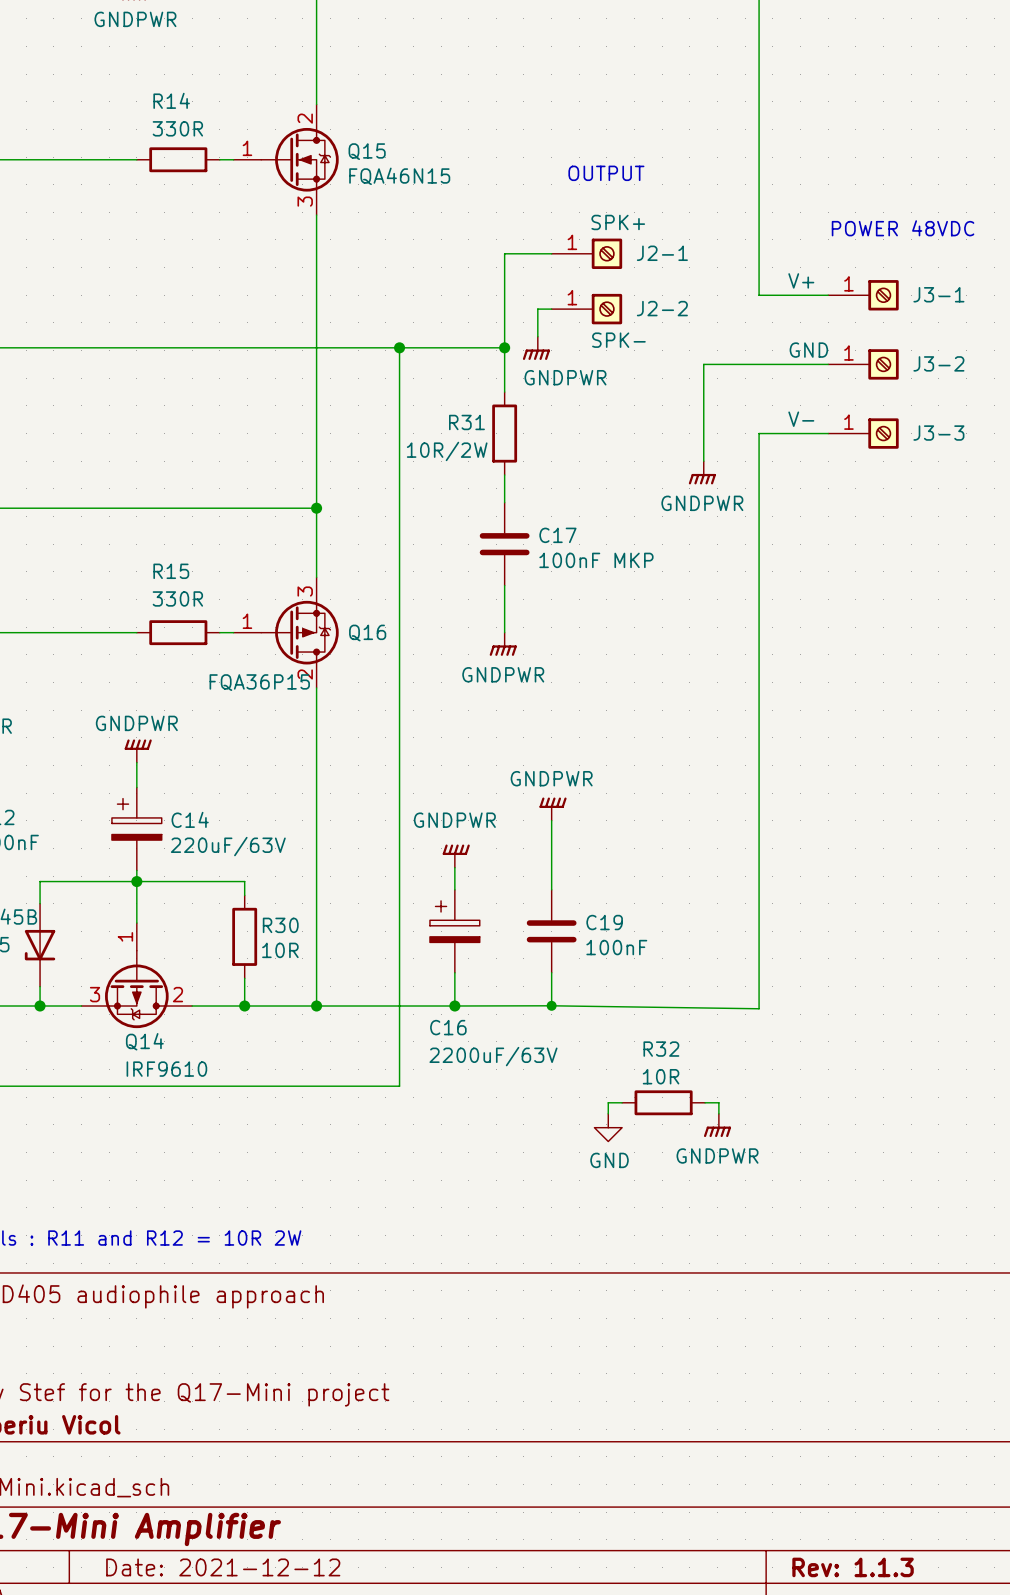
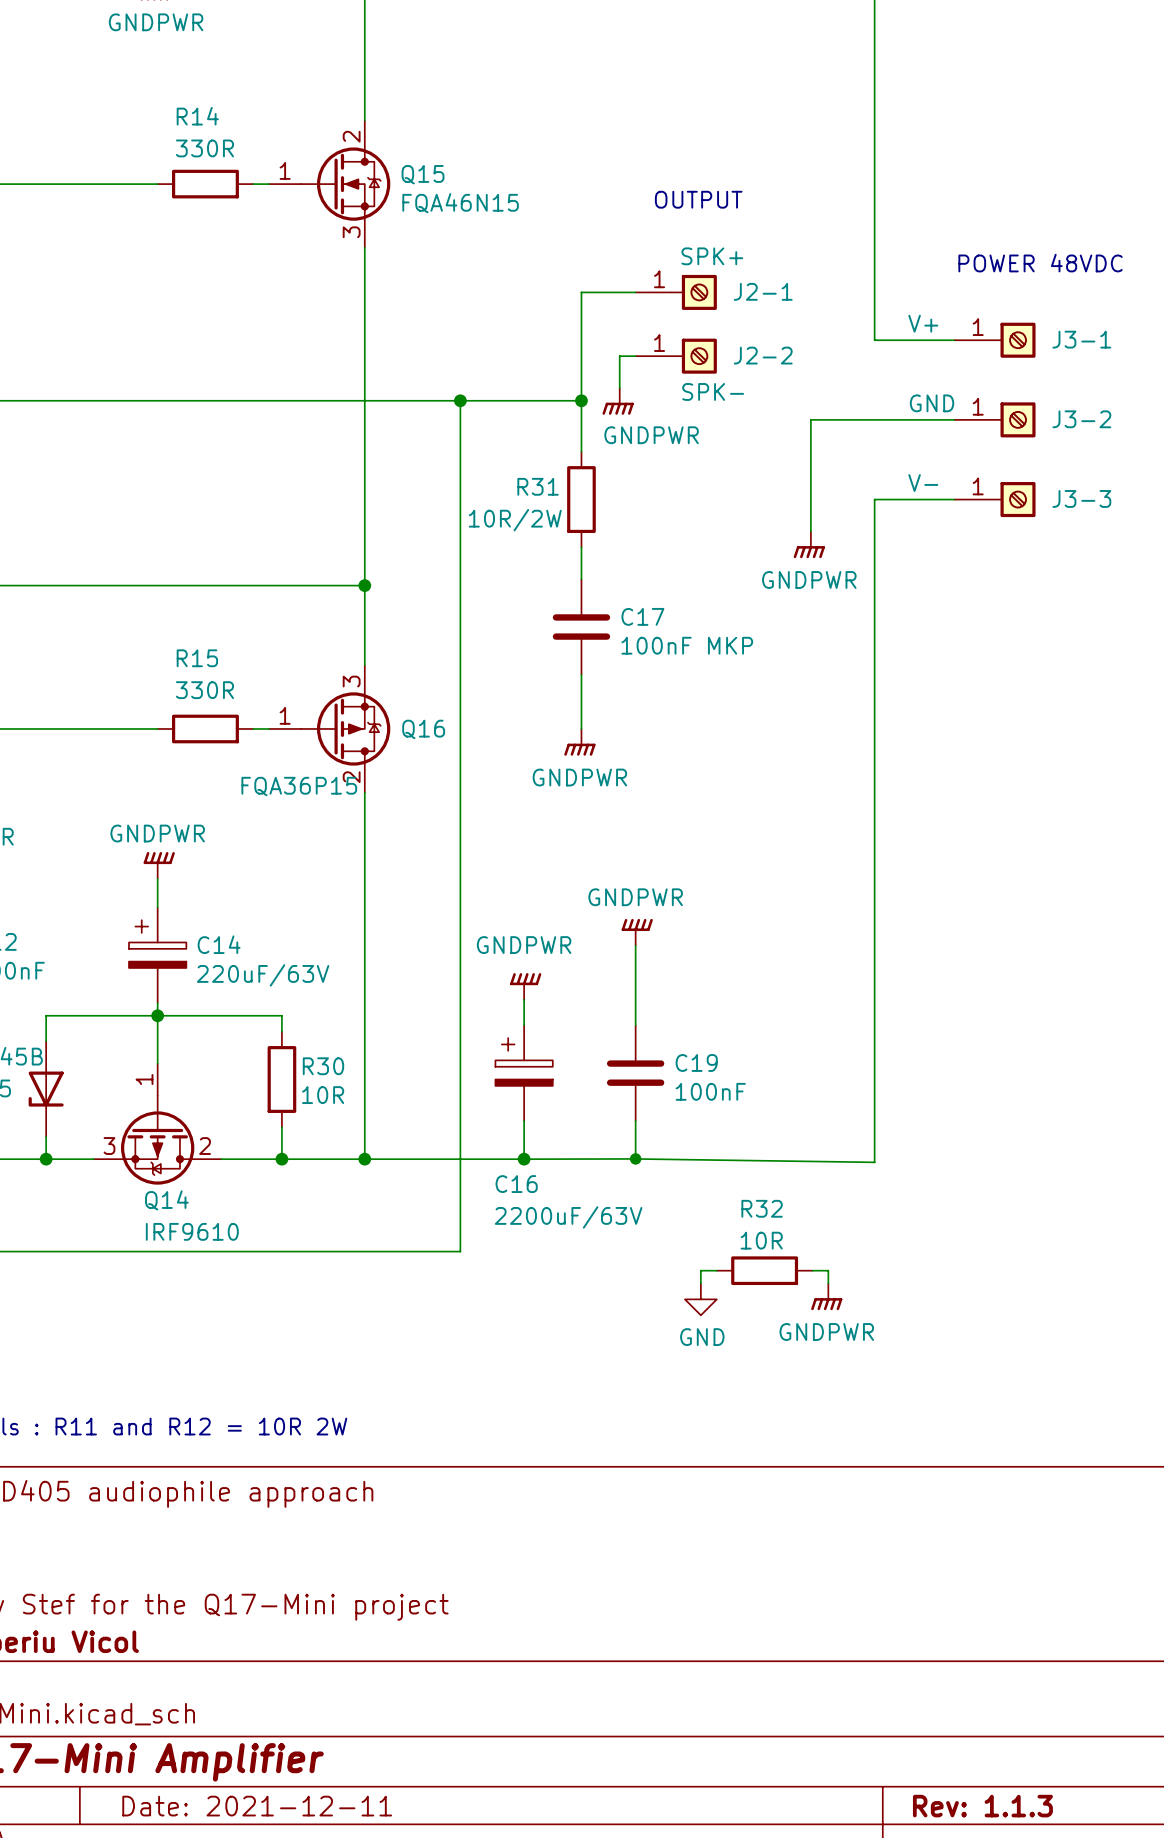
title block: Date: 2021-12-12 (223, 1567) -> Date: 2021-12-11 (257, 1806)

